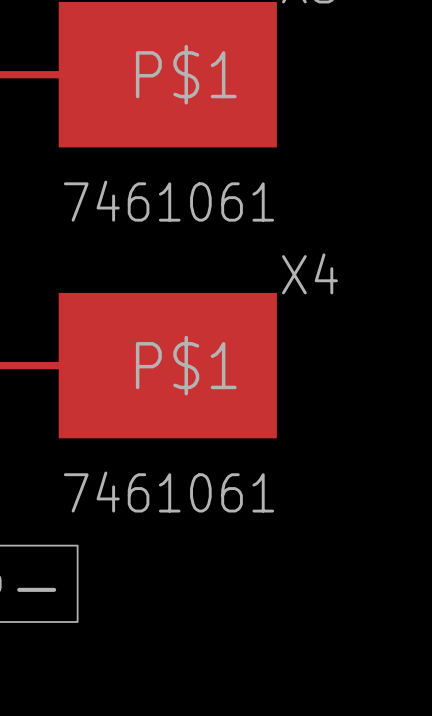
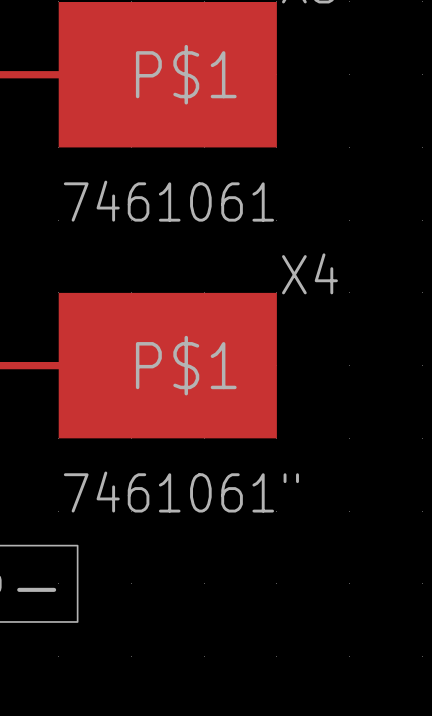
X4 value: 7461061 (168, 492) -> 7461061" (181, 492)

